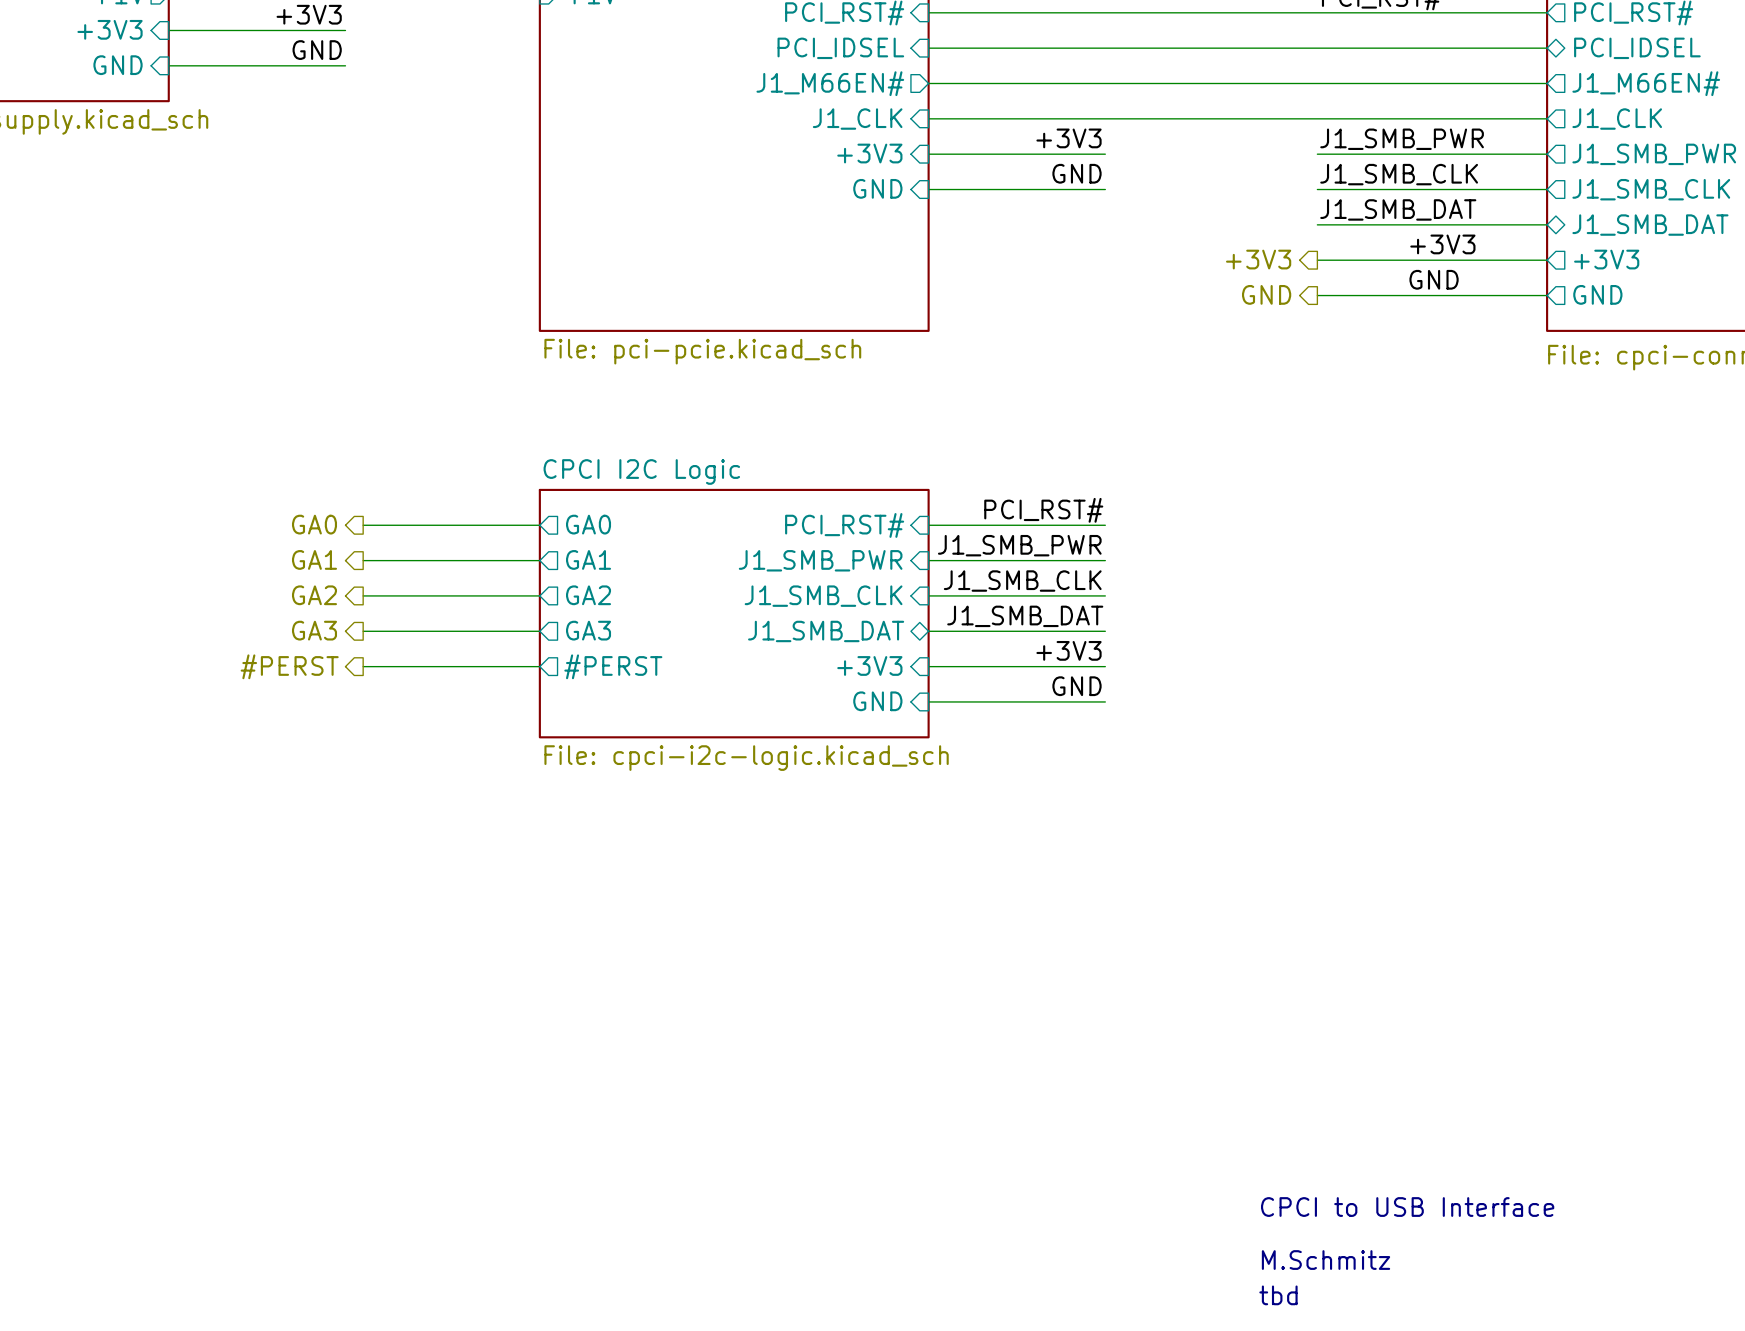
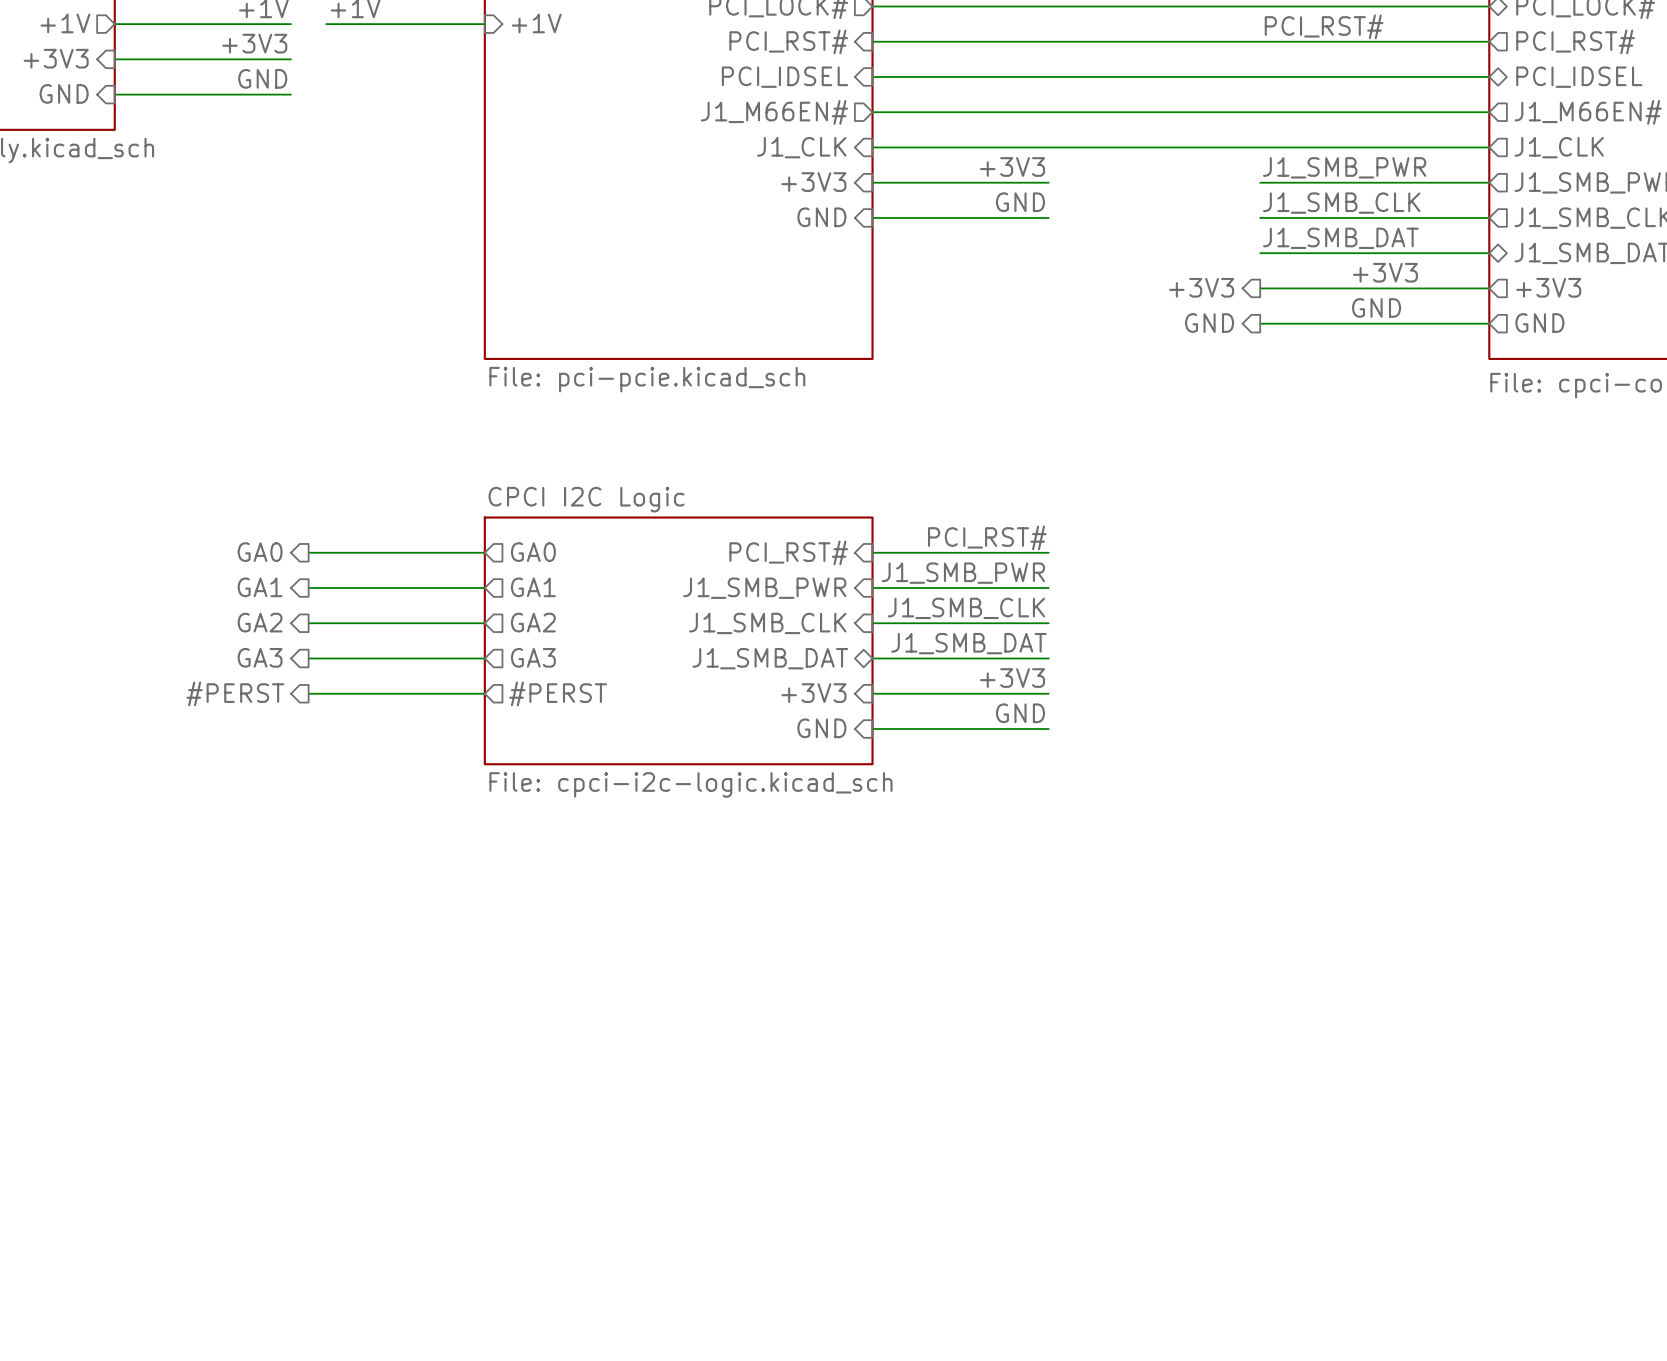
text: CPCI to USB Interface (1407, 1207) -> none
text: M.Schmitz (1326, 1260) -> none
text: tbd (1278, 1295) -> none

